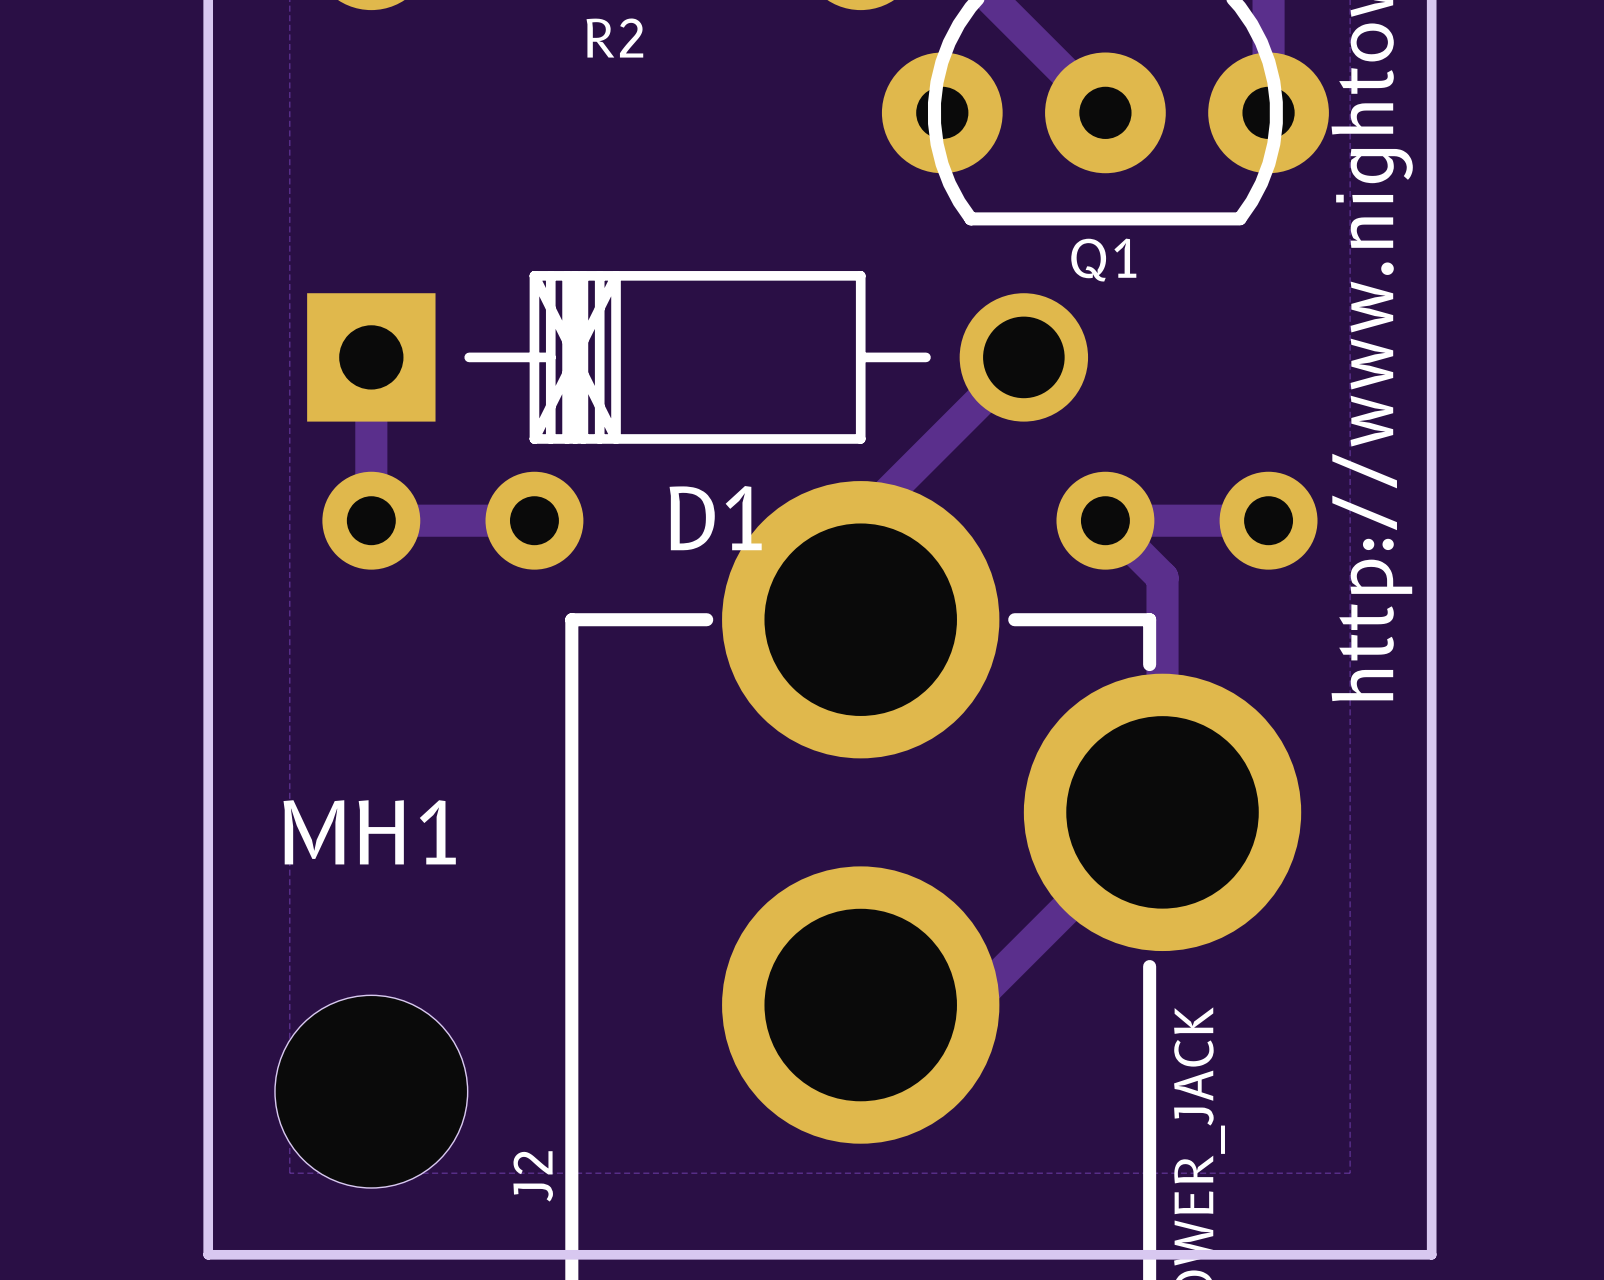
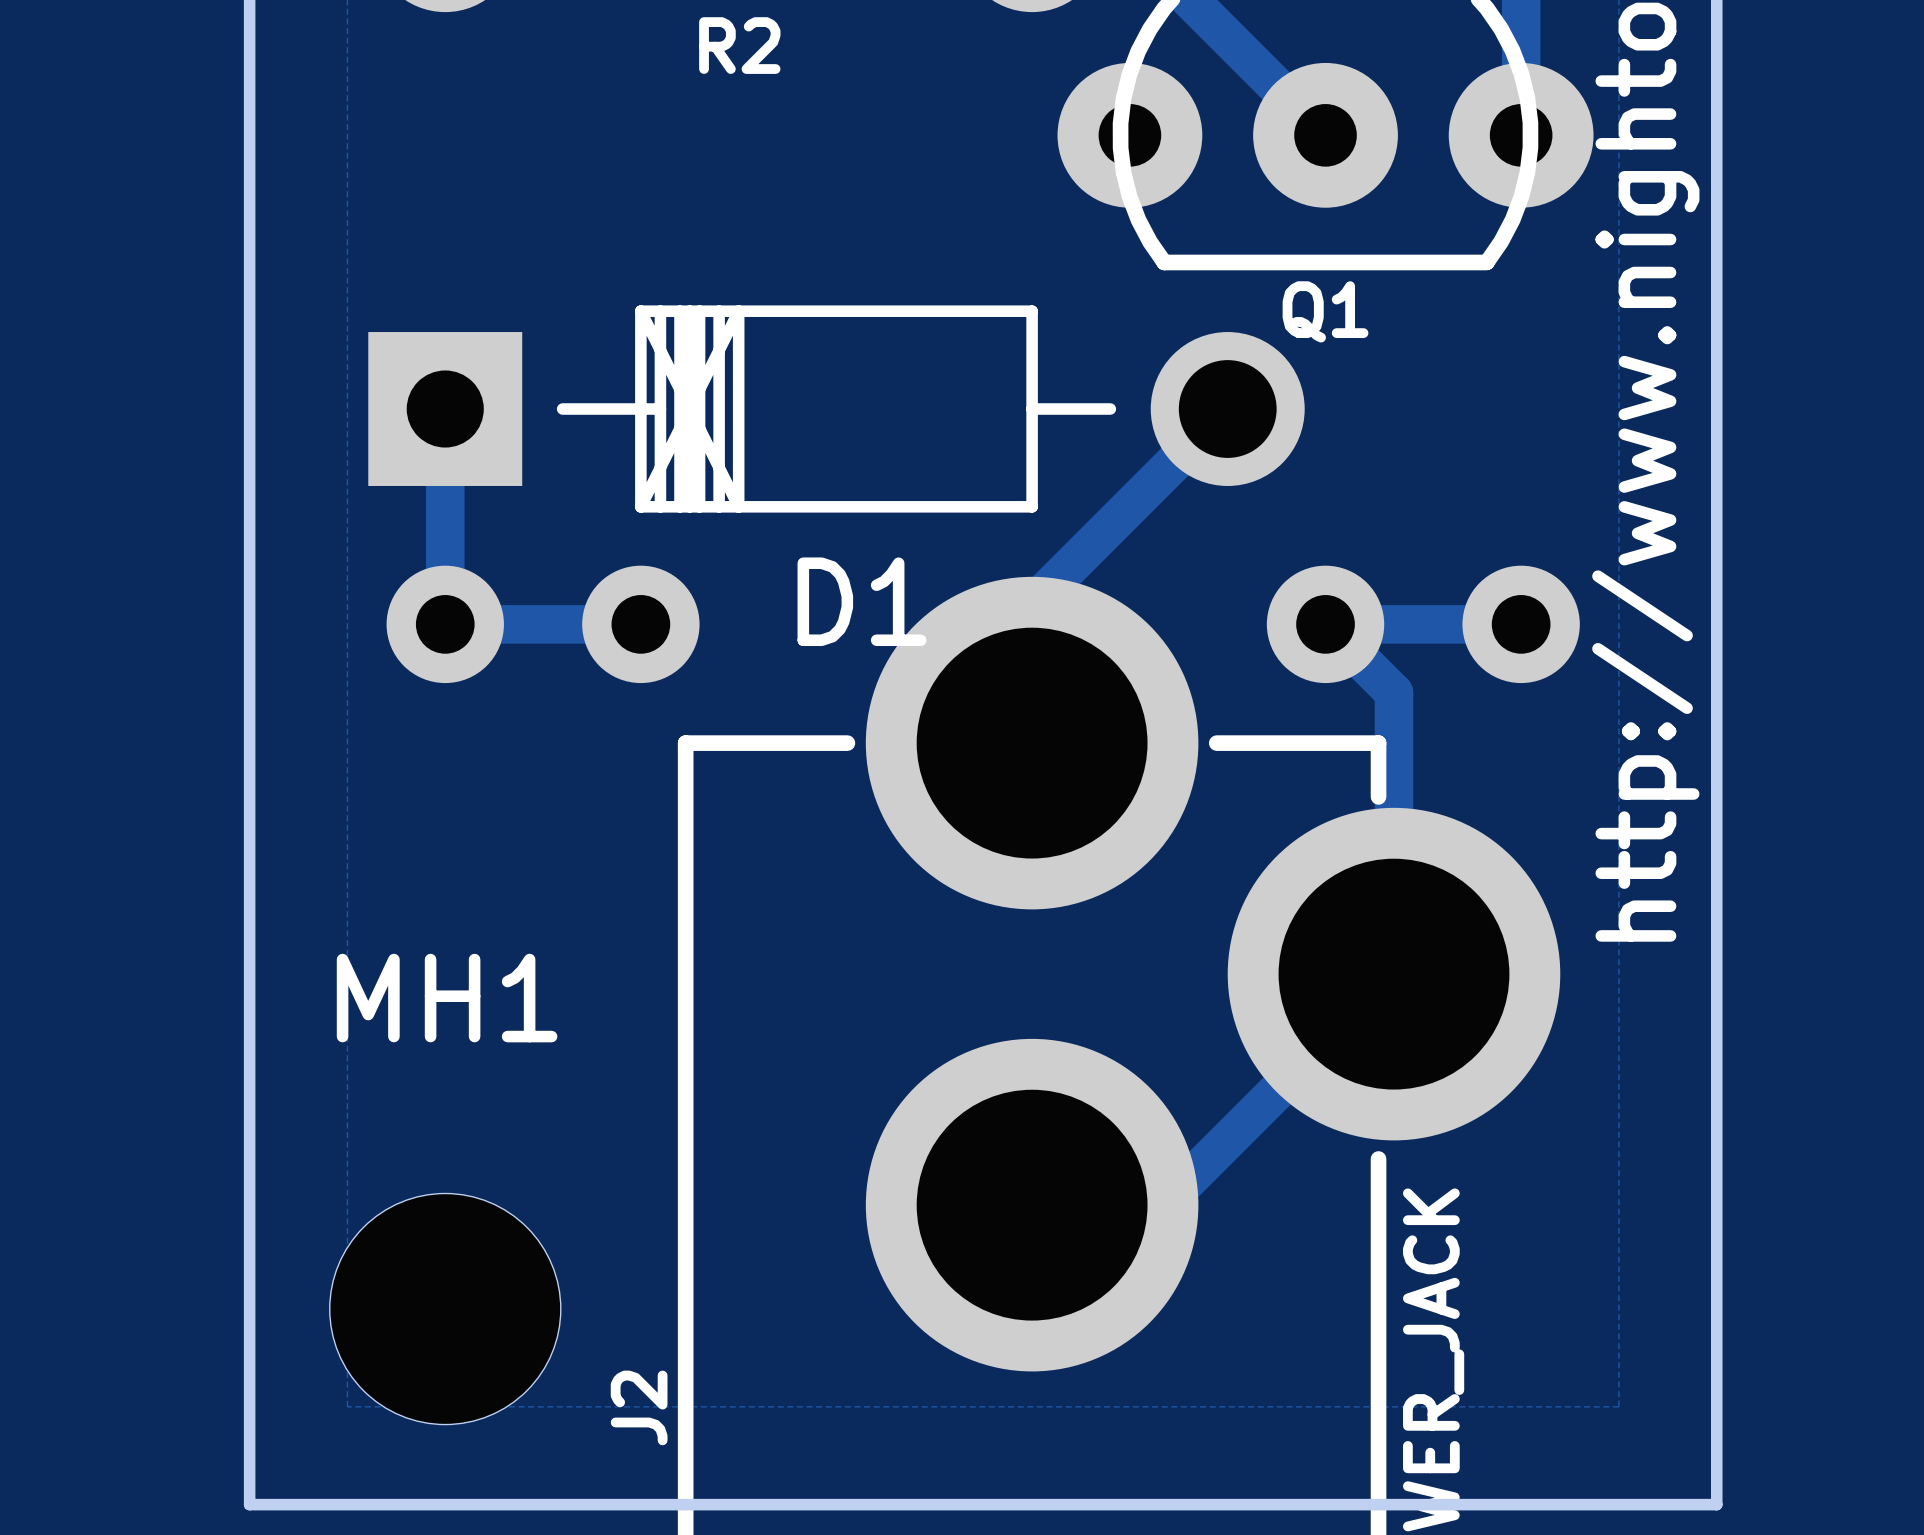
D1 position: (697, 357) -> (836, 409)
track: (1023, 357) (860, 520) -> (1227, 409) (1032, 604) (1032, 624)

